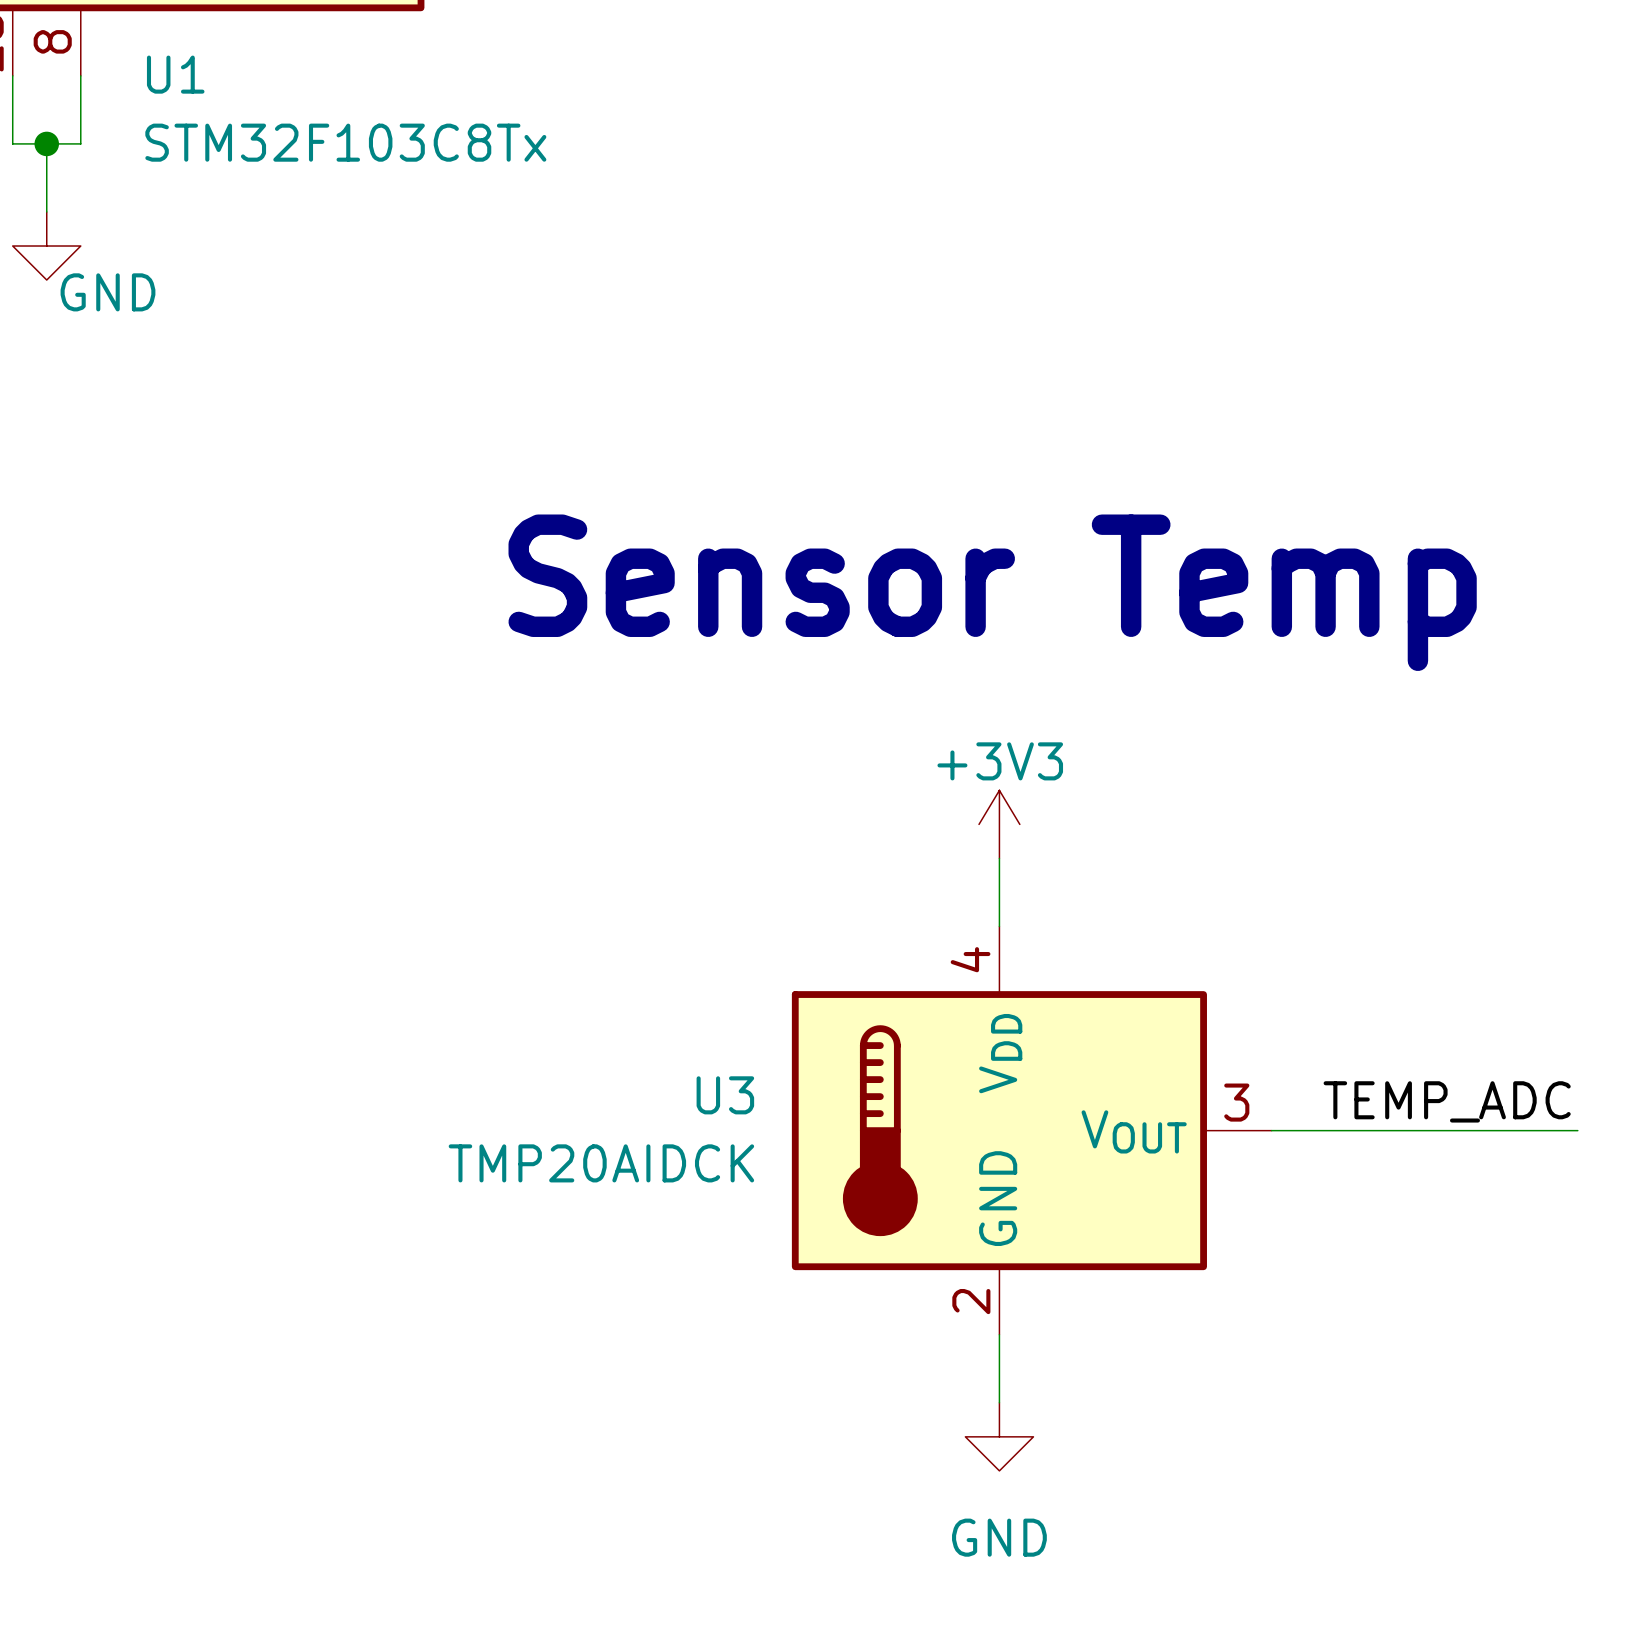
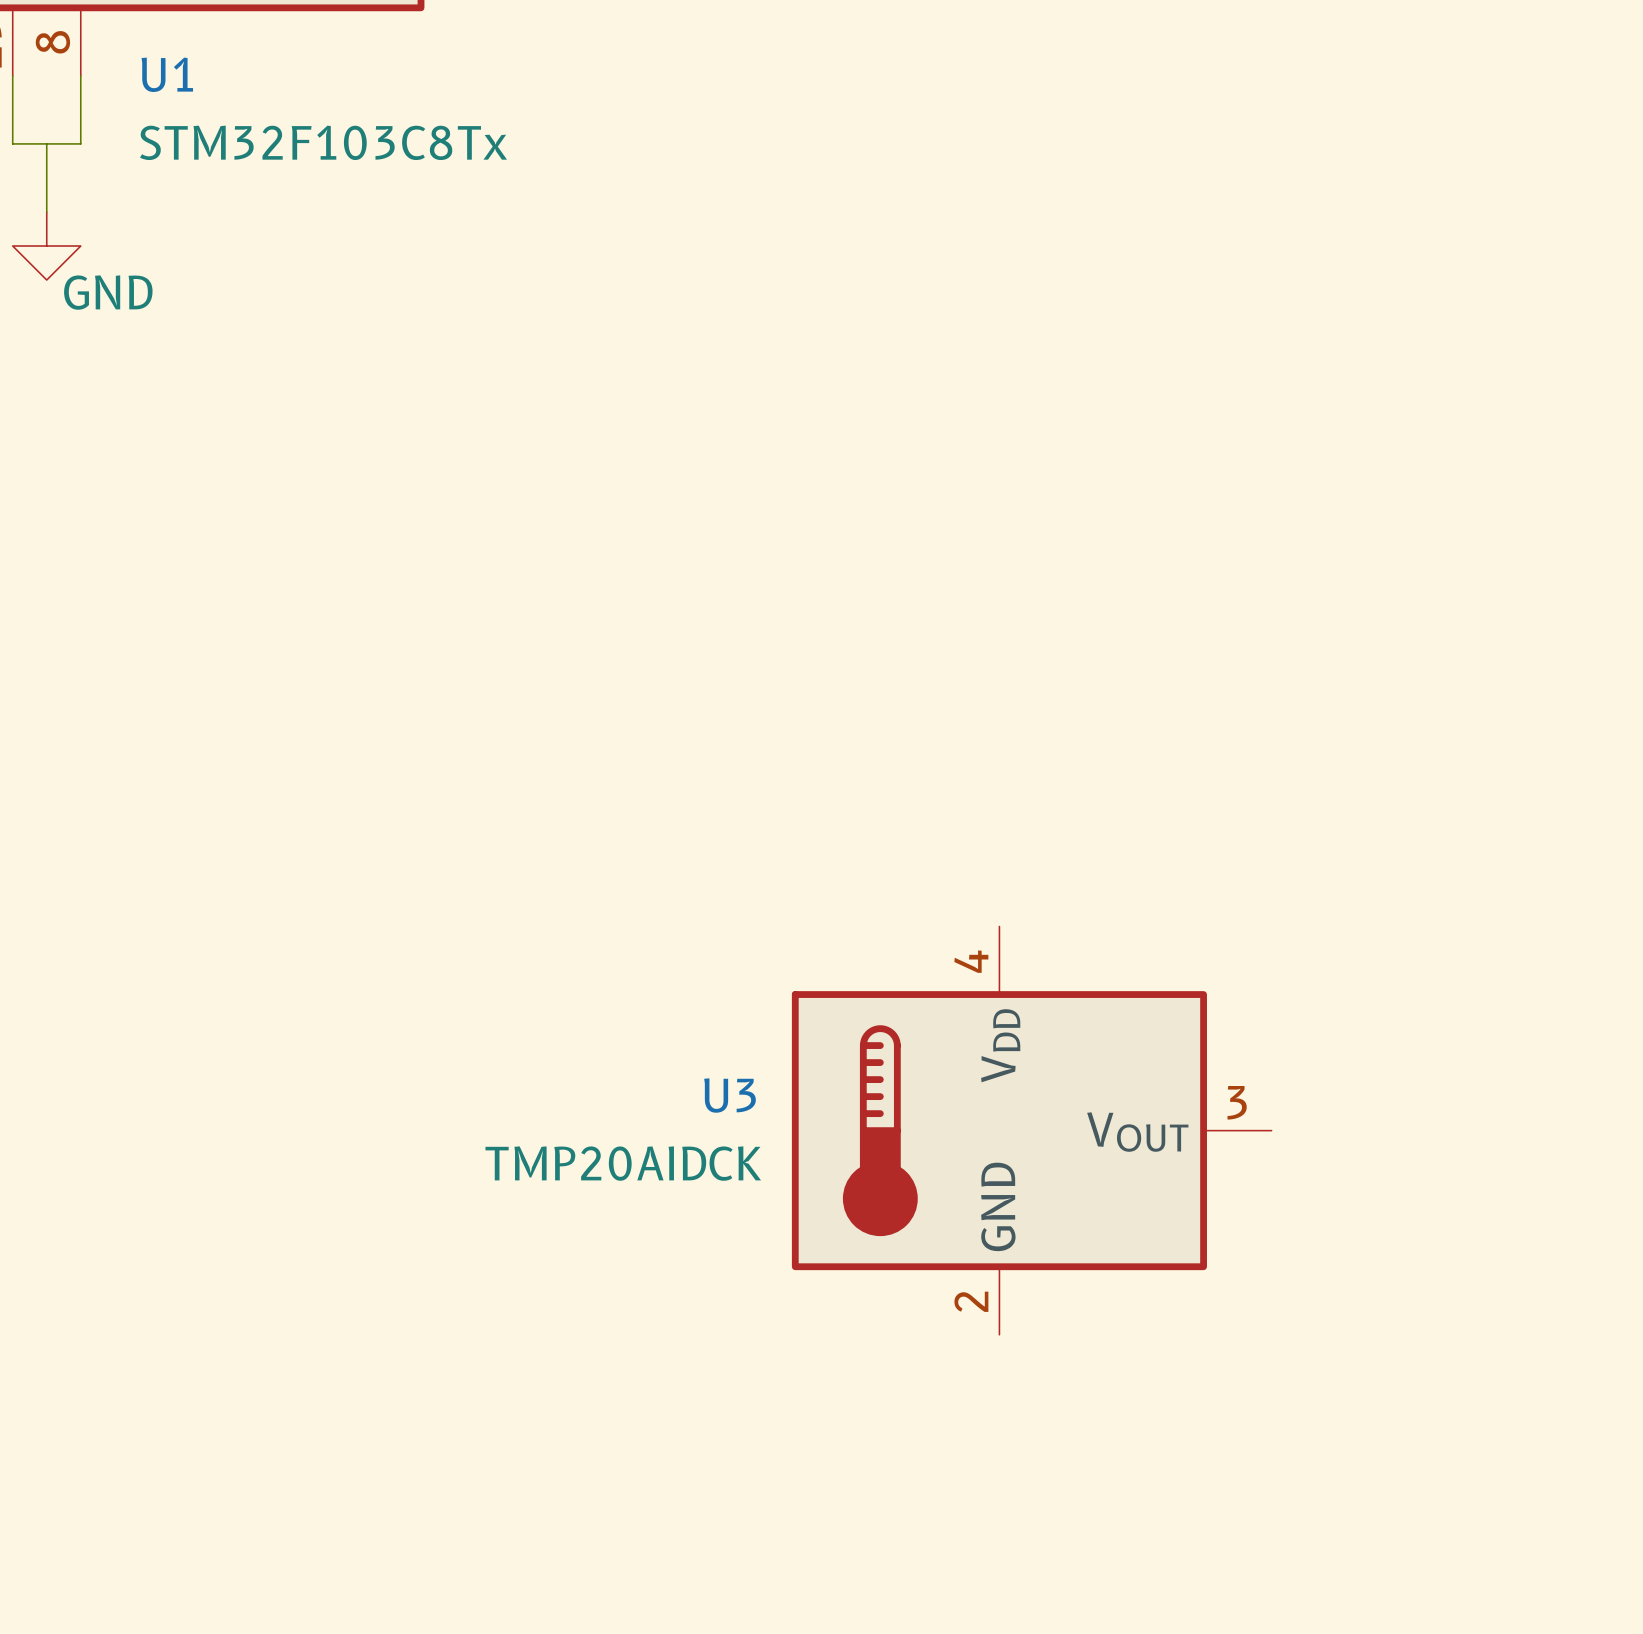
junction: (46, 143) -> none
text: Sensor Temp (992, 592) -> none
power symbol: +3V3 (999, 824) -> none
wire: (999, 858) (999, 926) -> none
label: TEMP_ADC (1447, 1101) -> none
wire: (1271, 1130) (1577, 1130) -> none
wire: (999, 1334) (999, 1402) -> none
power symbol: GND (999, 1436) -> none

